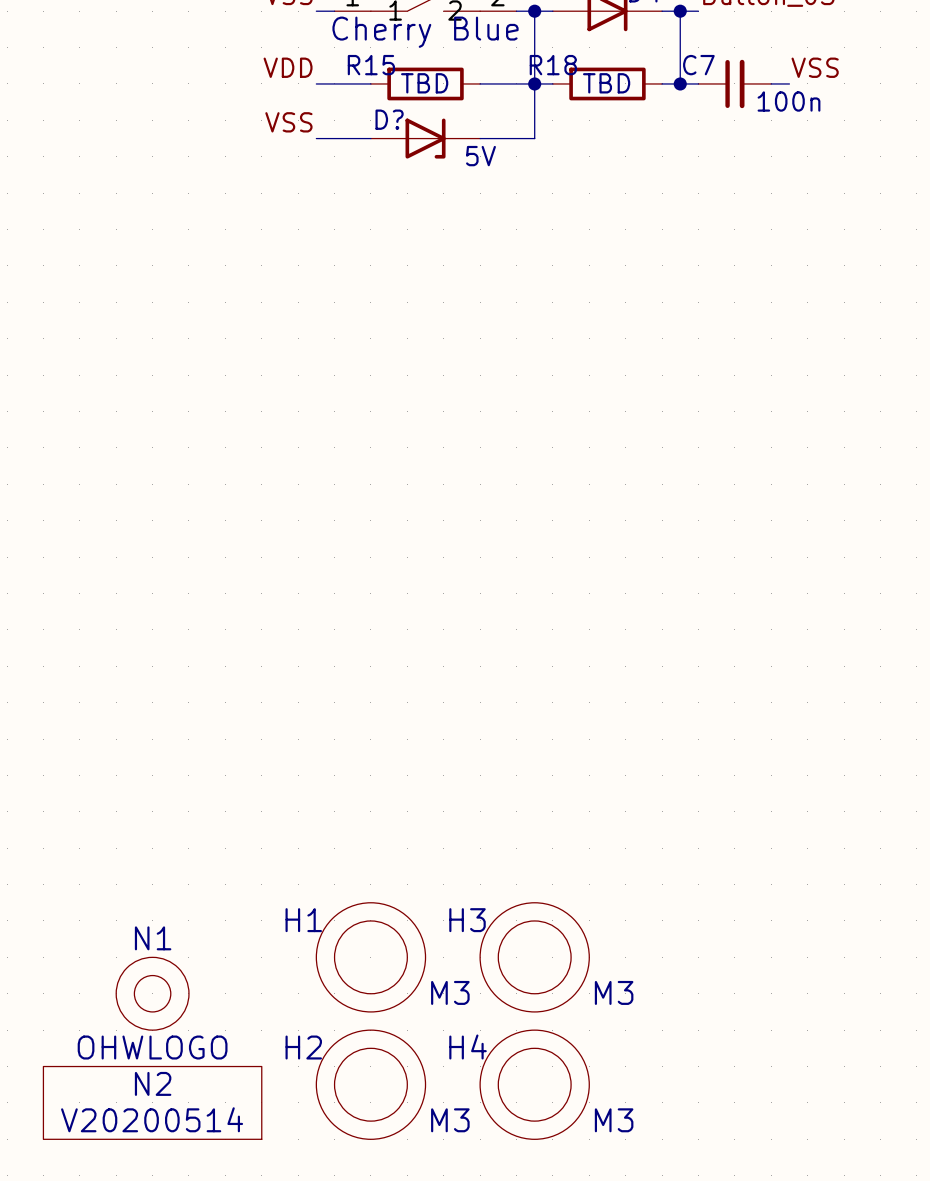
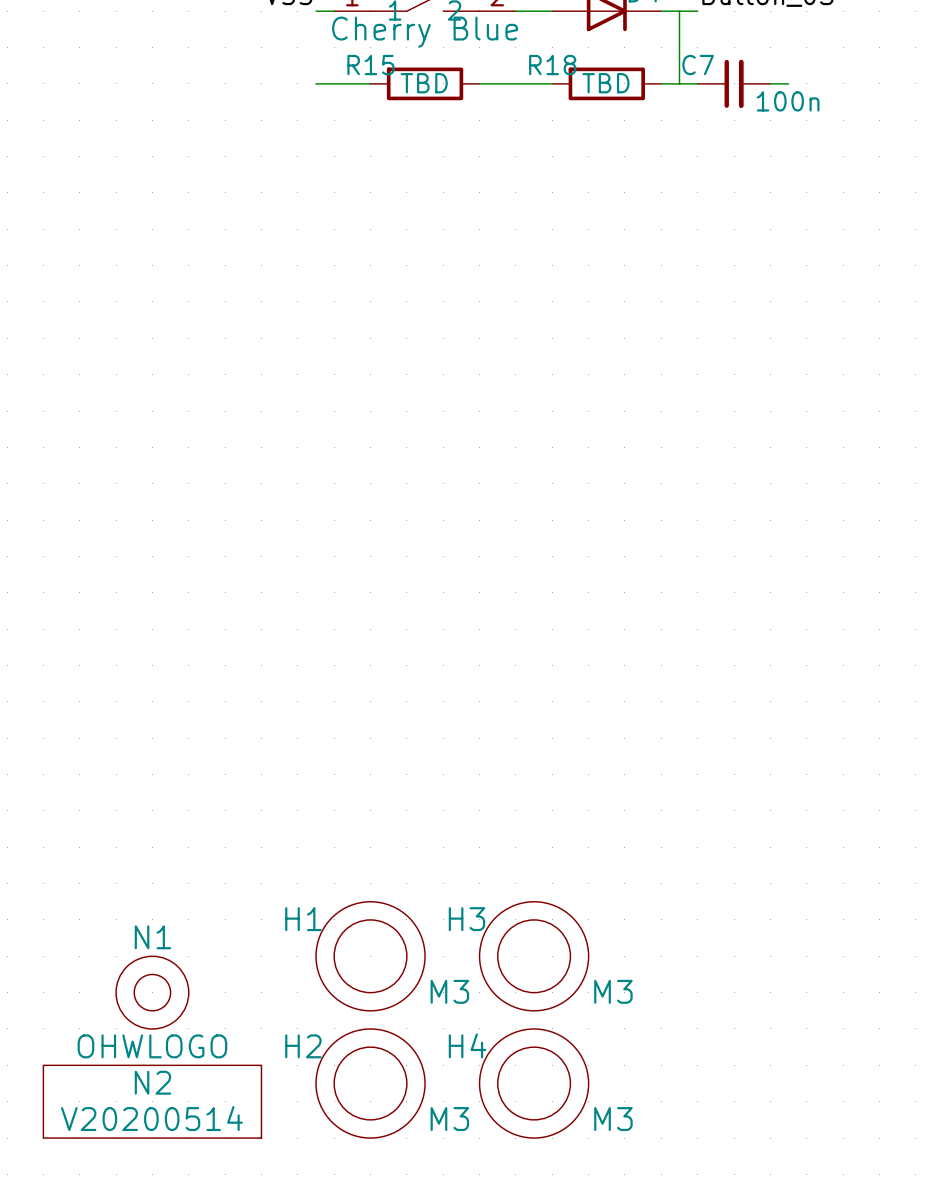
wire: (534, 11) (534, 138) (480, 138) -> none
junction: (534, 11) -> none
junction: (680, 11) -> none
label: VDD (288, 67) -> none
label: VSS (815, 67) -> none
junction: (534, 83) -> none
junction: (680, 83) -> none
label: VSS (288, 122) -> none
wire: (316, 138) (370, 138) -> none
D?: 5V (425, 138) -> none

